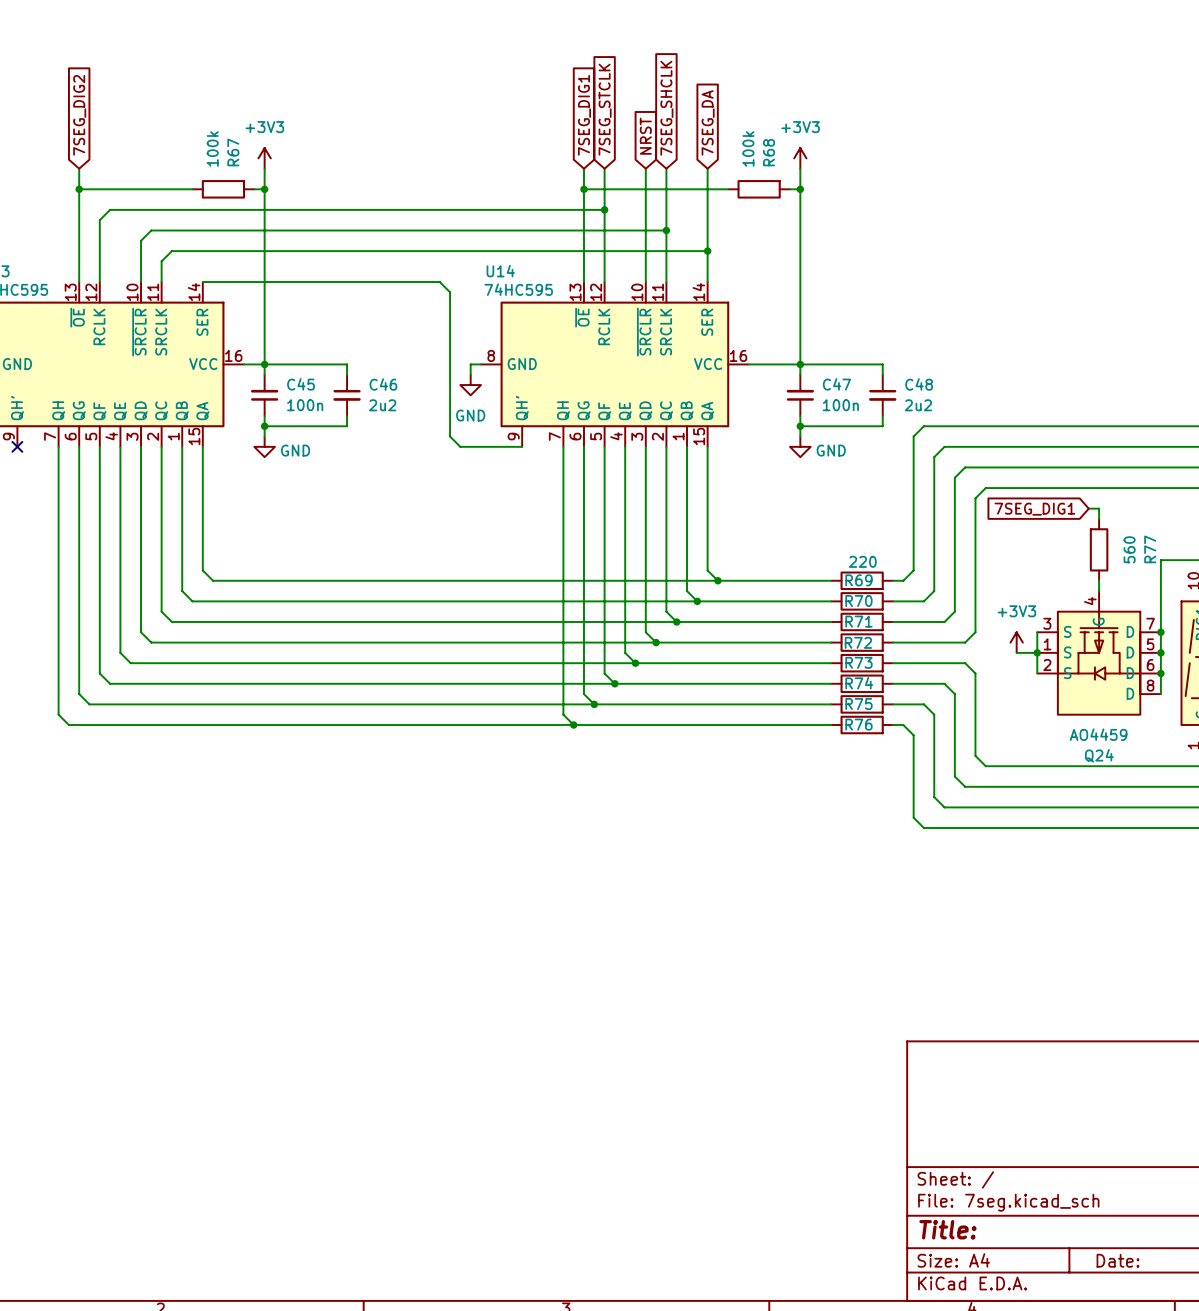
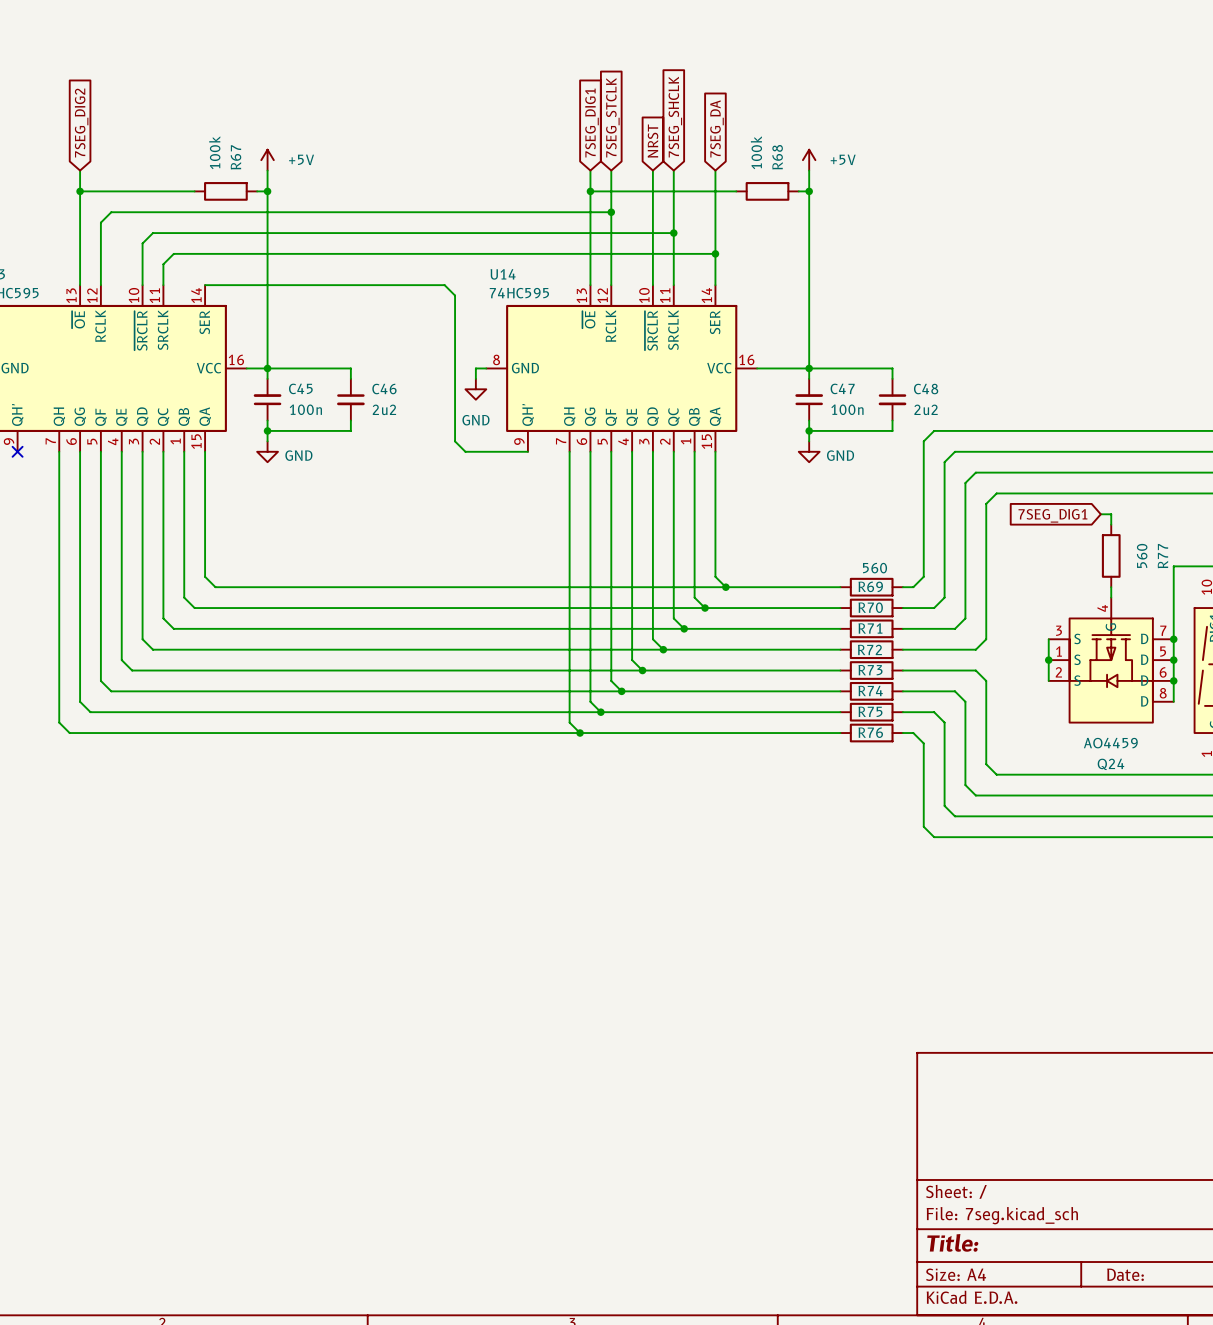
power symbol: +3V3 (264, 158) -> +5V (267, 160)
power symbol: +3V3 (800, 158) -> +5V (809, 160)
R69 value: 220 (862, 561) -> 560 (875, 568)
power symbol: +3V3 (1016, 642) -> none
wire: (1016, 652) (1037, 652) -> none

